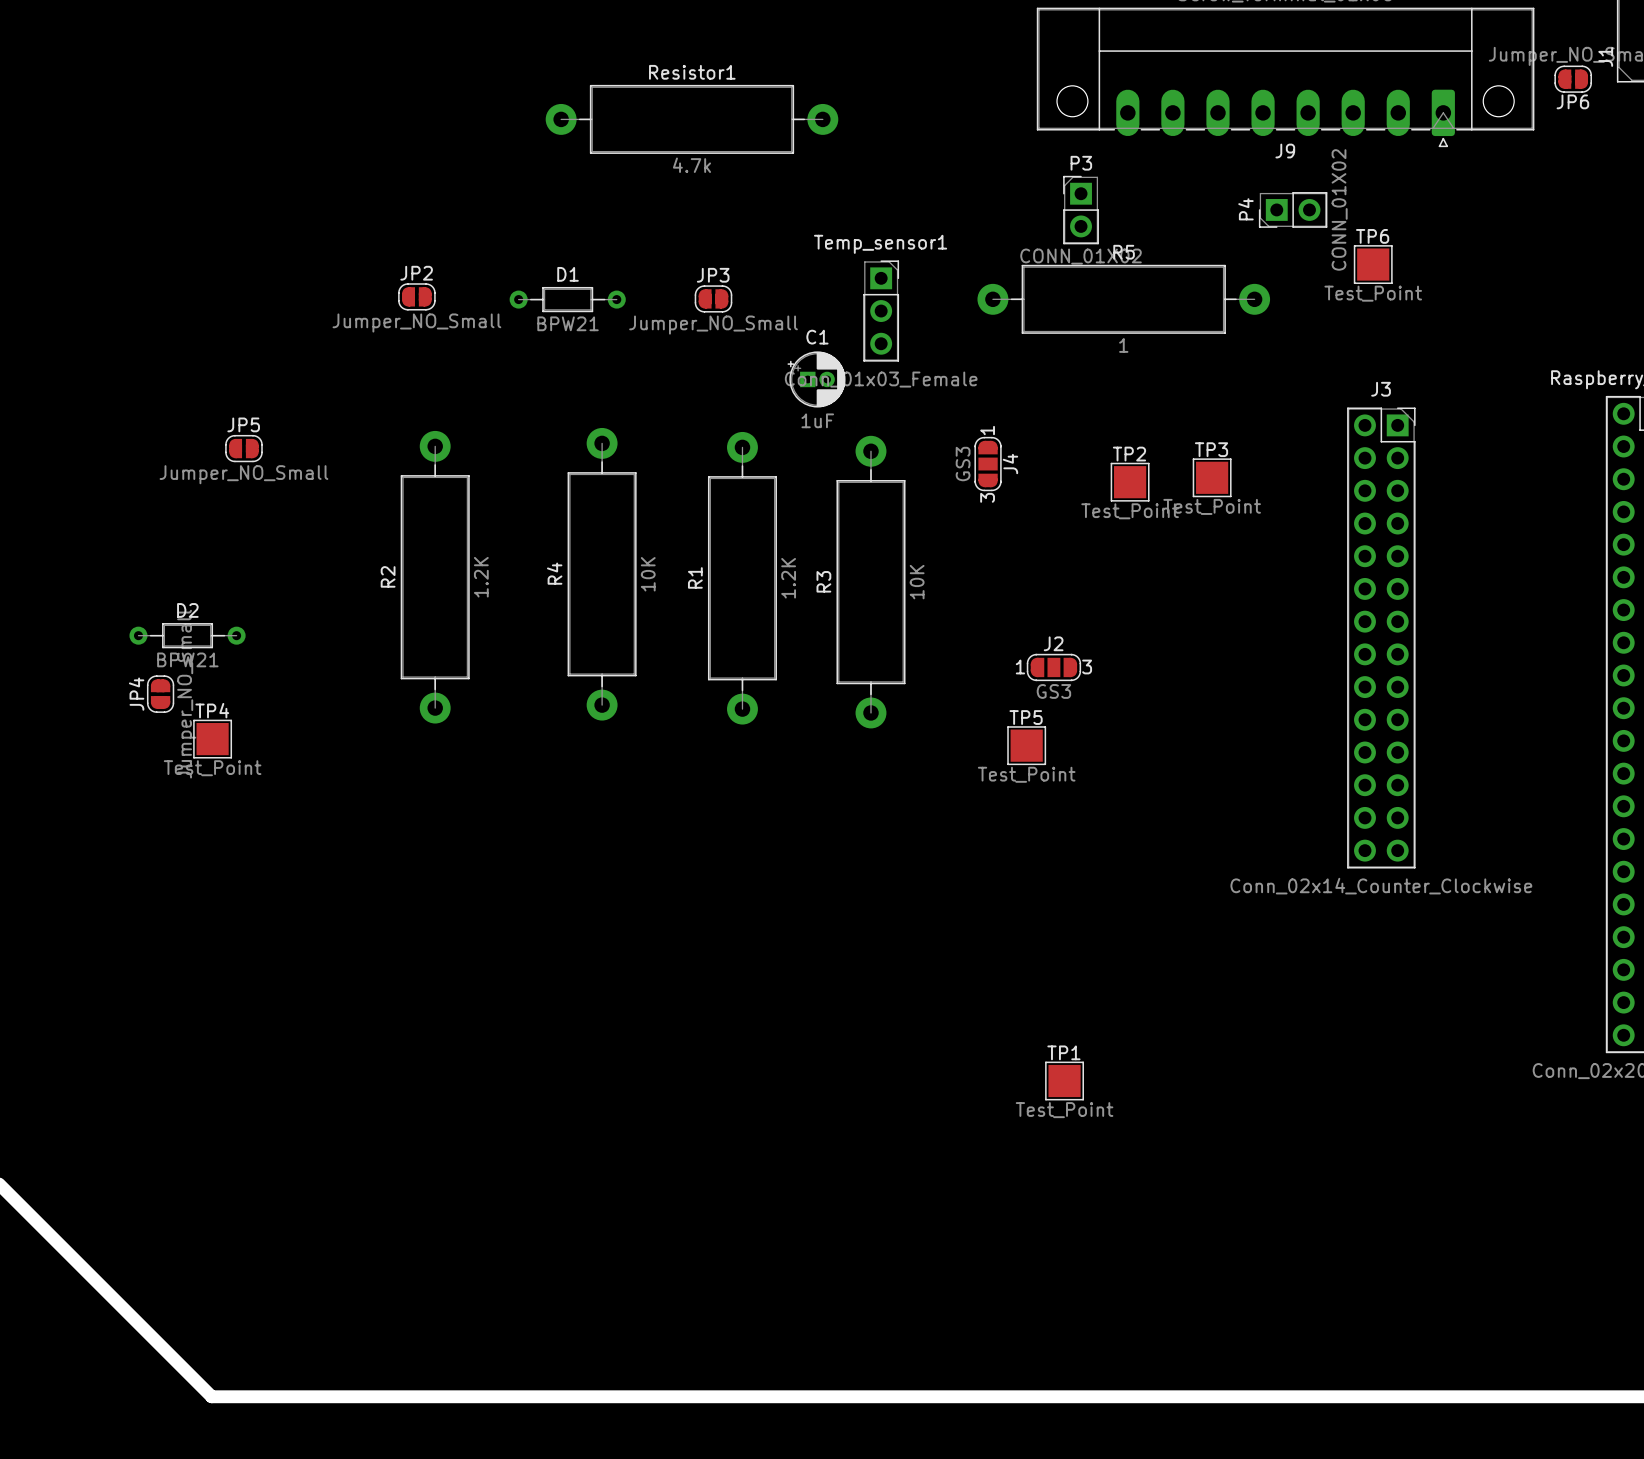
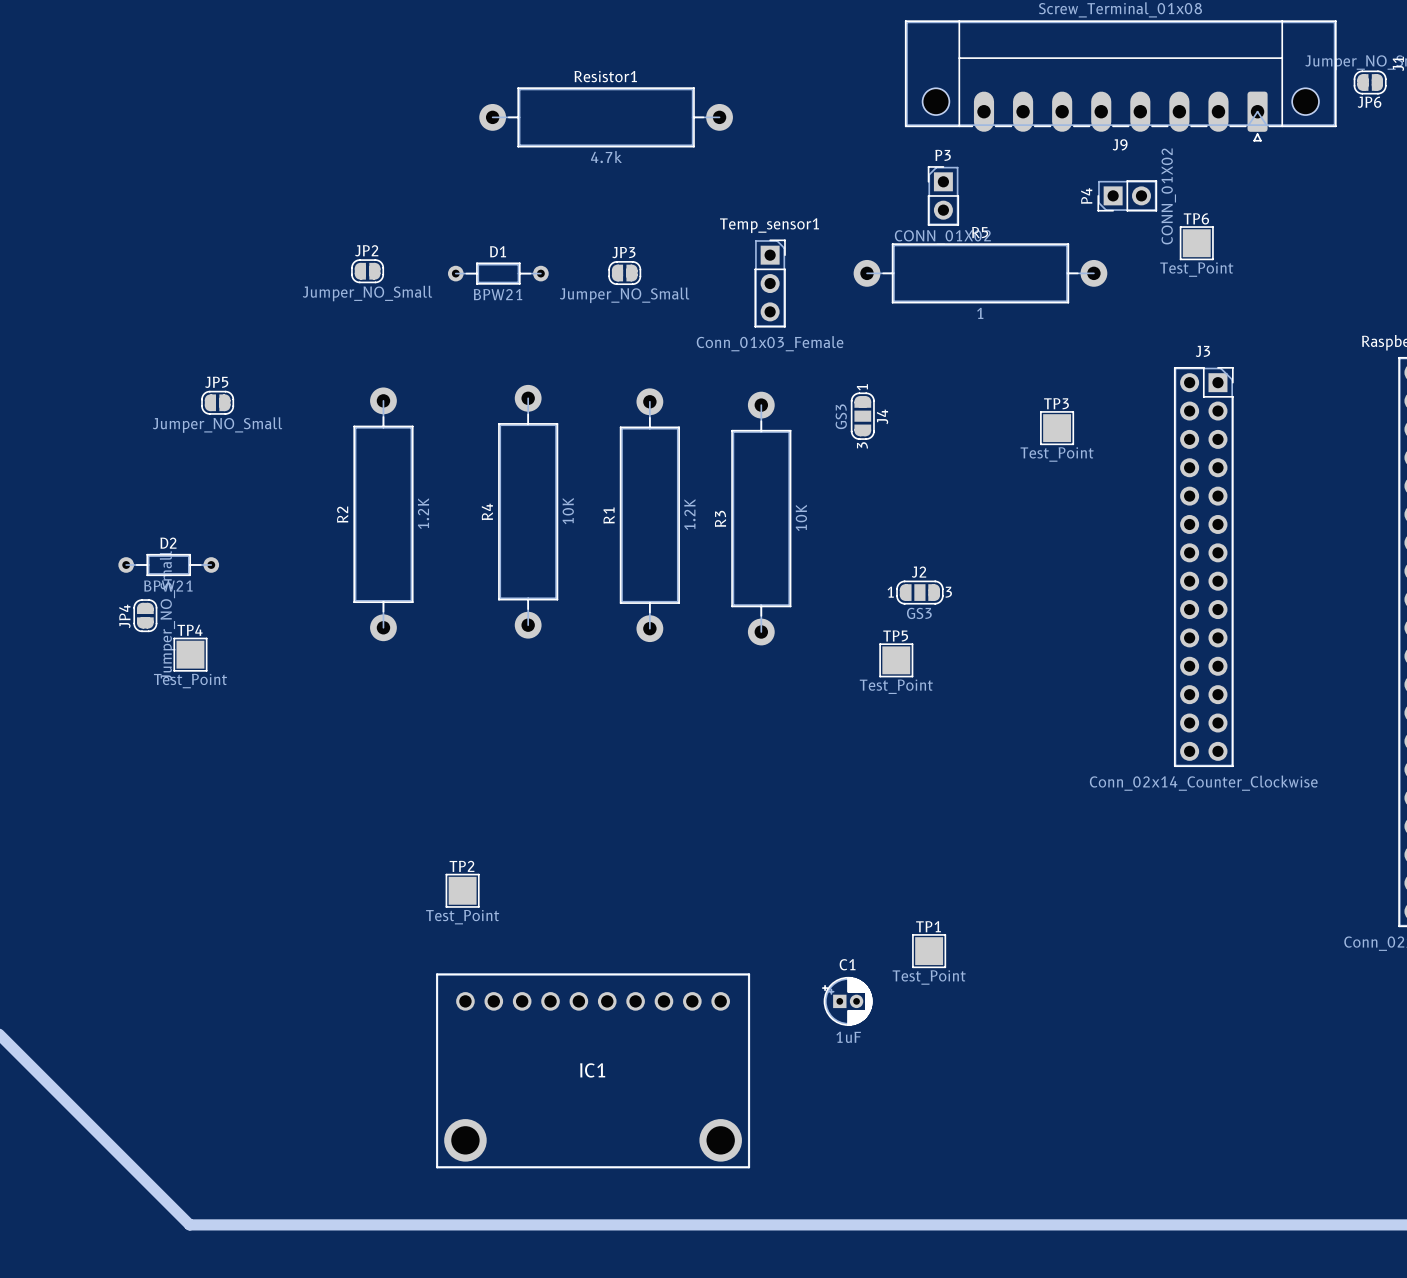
C1 position: (816, 379) -> (847, 1001)
TP2 position: (1130, 482) -> (462, 890)
IC1: none -> (593, 1070)

